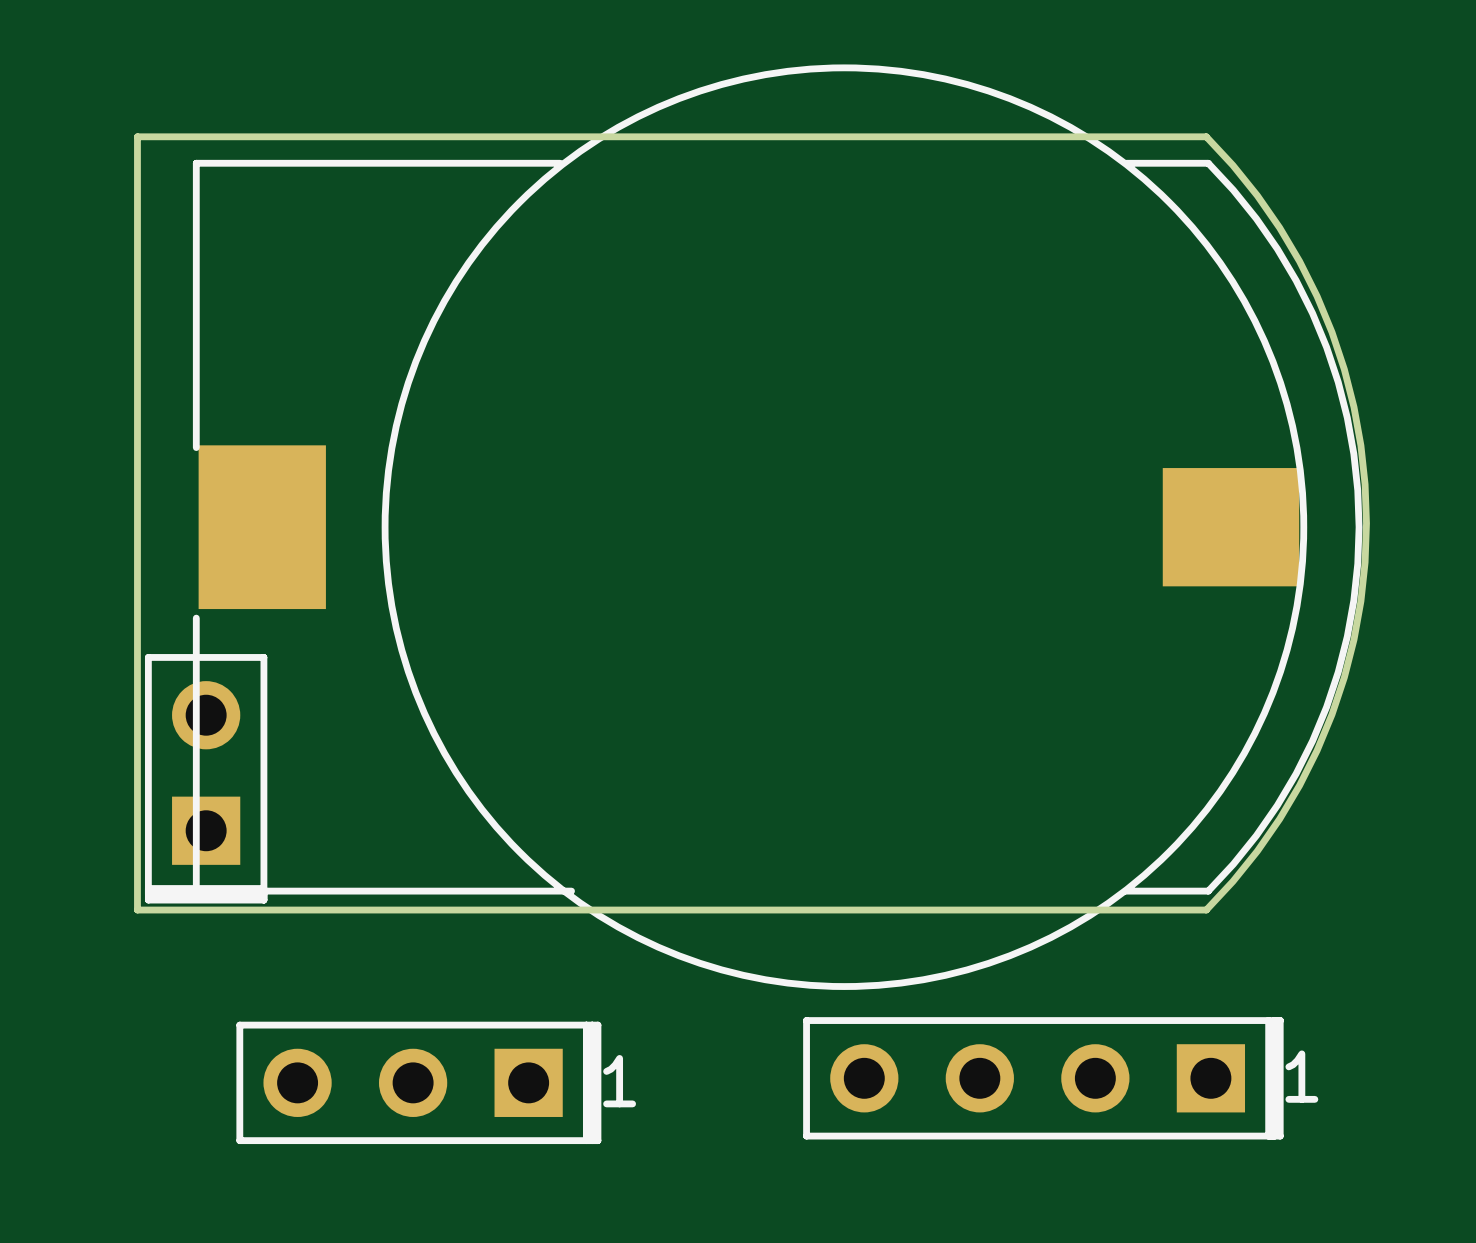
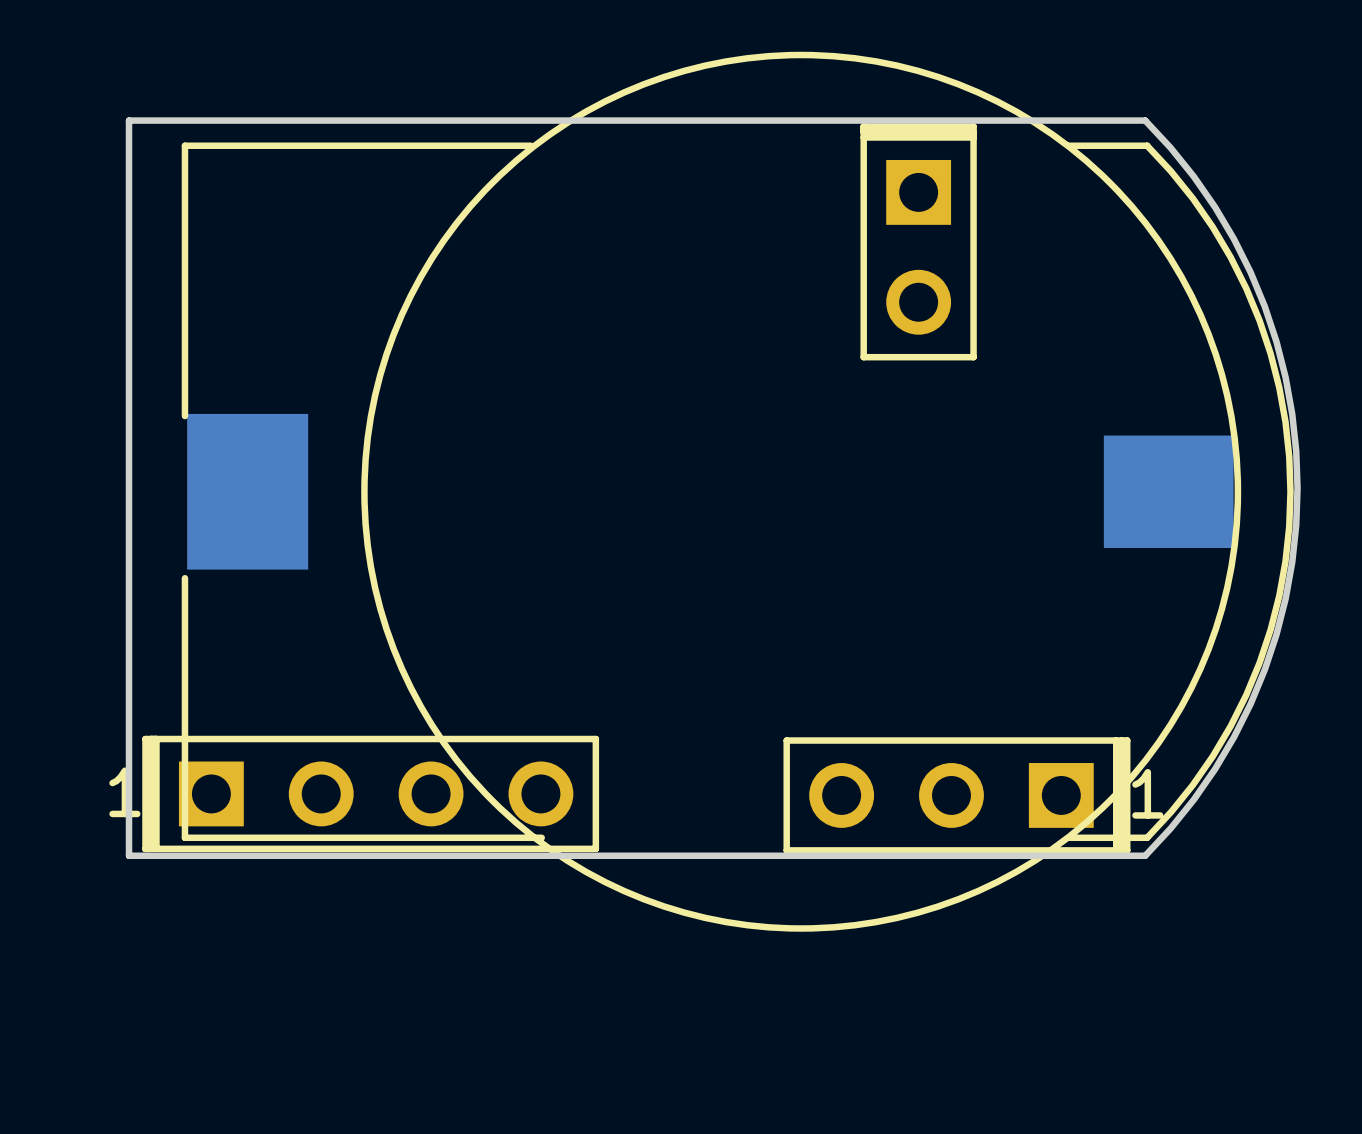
part rotation: 0° (206, 778) -> 180° (918, 241)
part position: (206, 778) -> (918, 241)
part rotation: 0° (1043, 1078) -> 180° (370, 793)
part position: (1043, 1078) -> (370, 793)
part position: (418, 1082) -> (956, 795)

